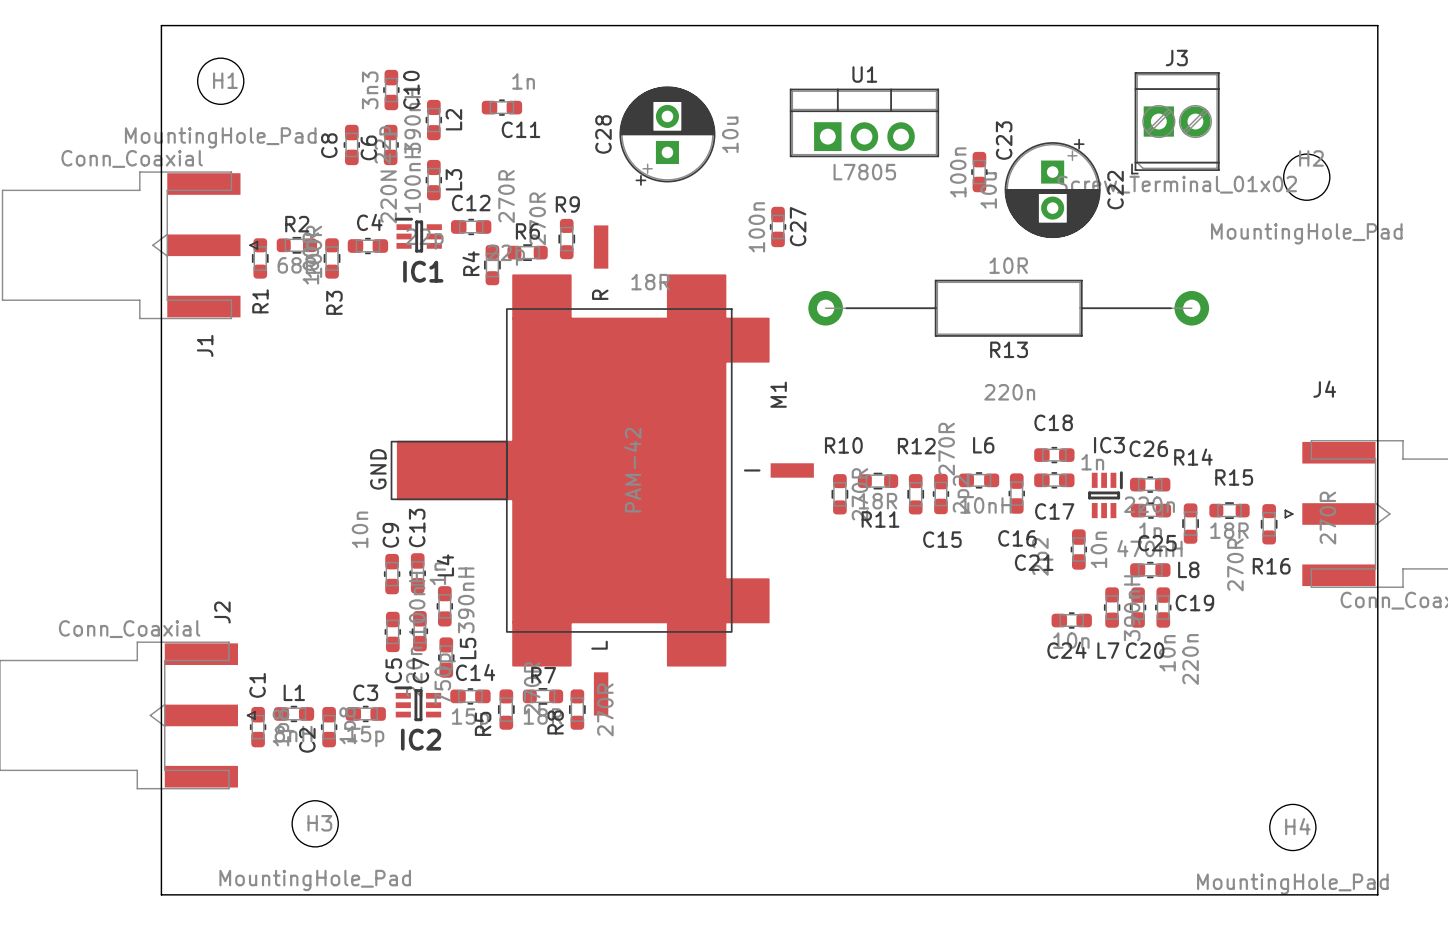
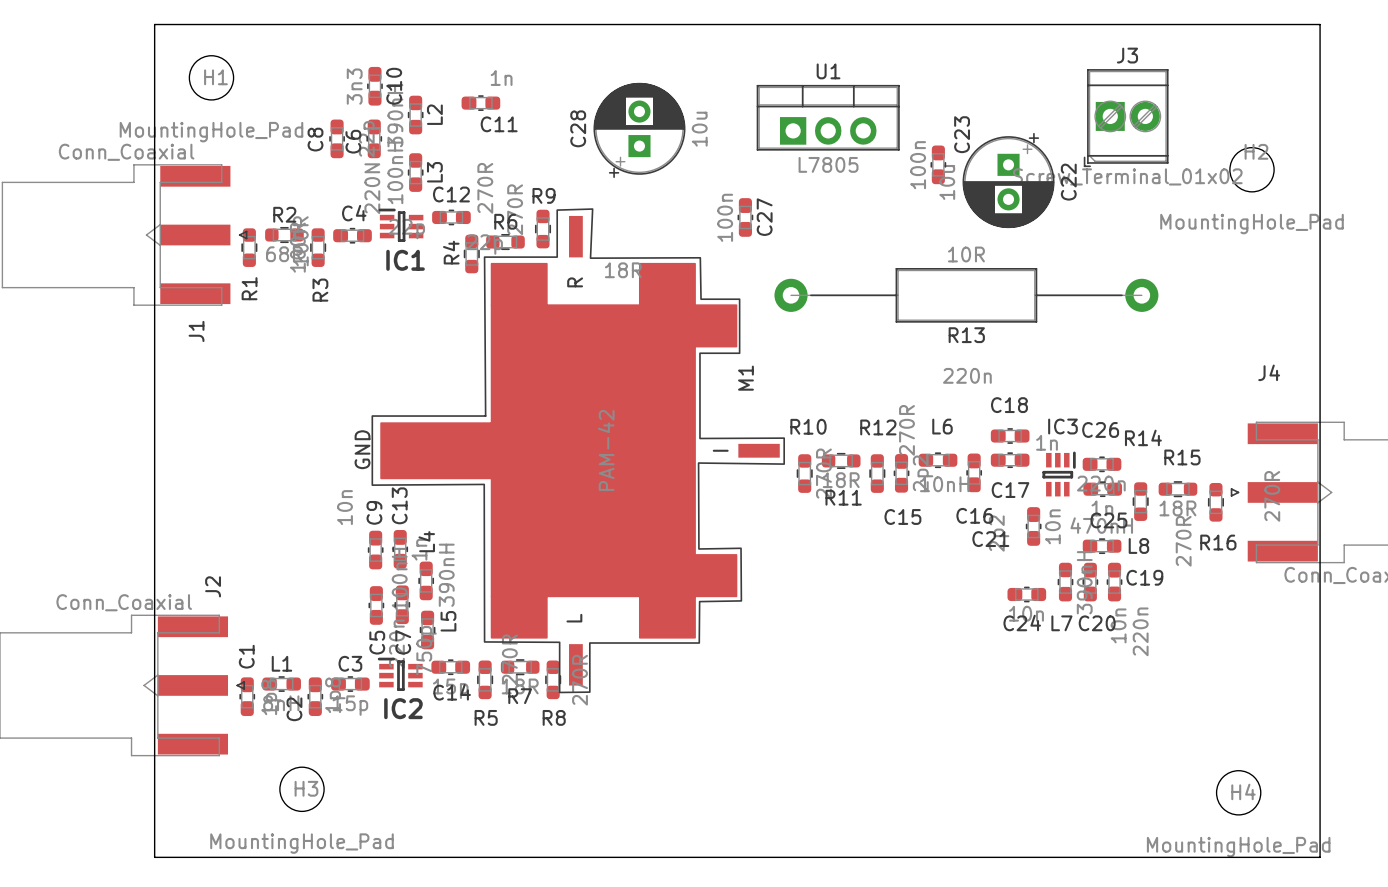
M1 footprint: [390, 225, 814, 716] -> [371, 208, 786, 694]
C14 name position: C14 (475, 672) -> C14 (452, 692)
R7 name position: R7 (543, 675) -> R7 (520, 696)
R8 name rotation: 0° (555, 722) -> 90° clockwise (554, 717)
R5 name rotation: 0° (483, 723) -> 90° clockwise (486, 717)

